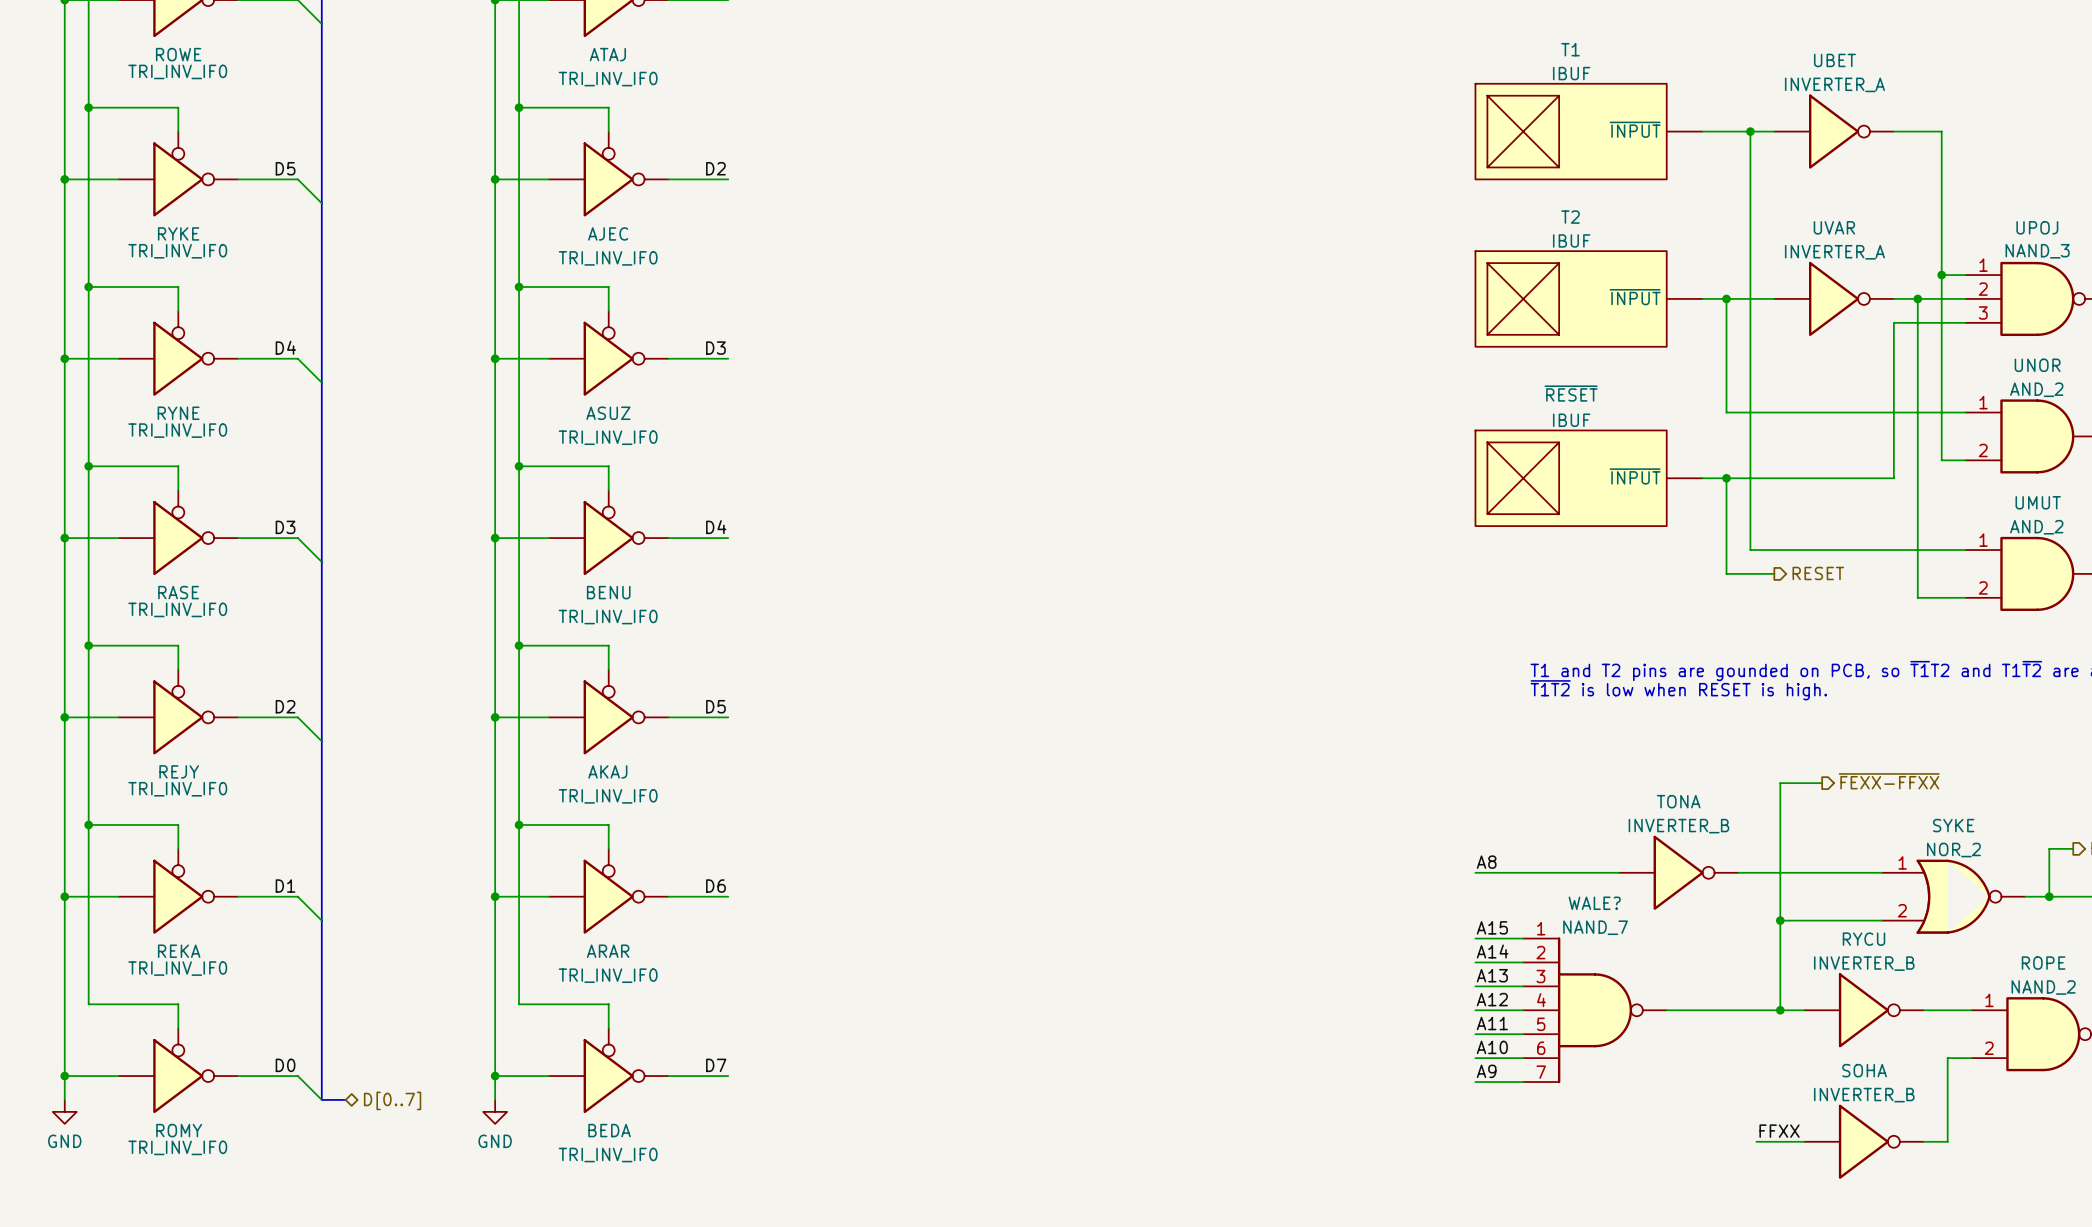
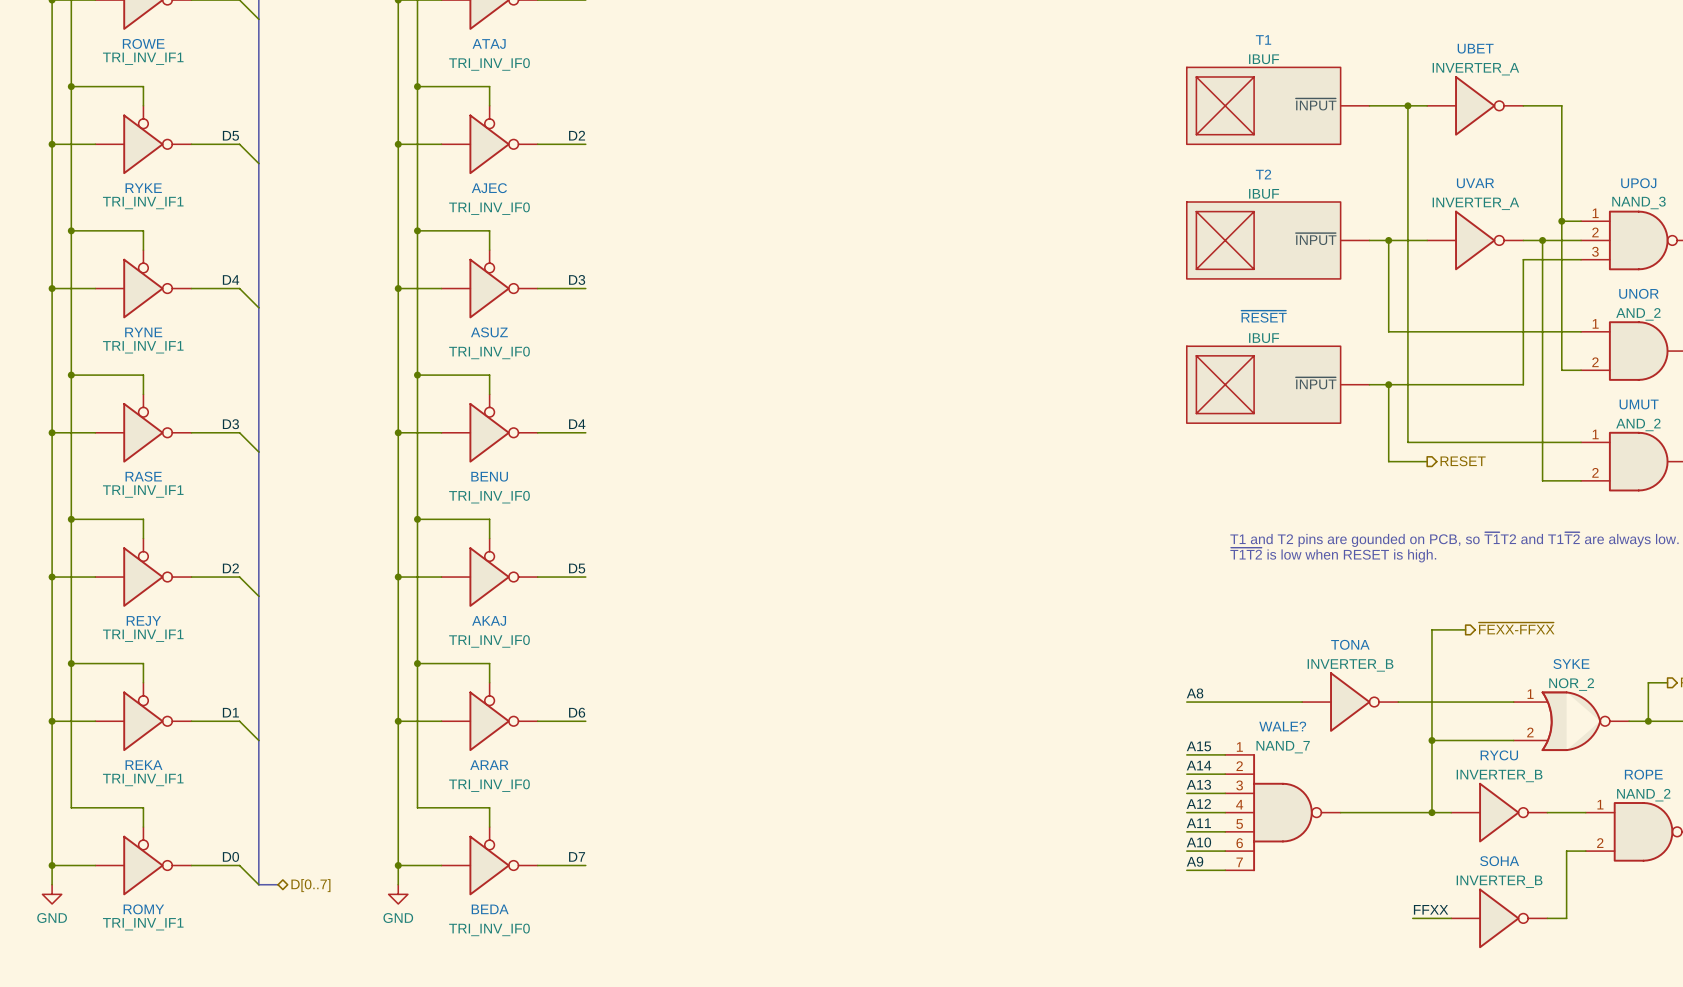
ROWE value: TRI_INV_IF0 (177, 71) -> TRI_INV_IF1 (143, 58)
RYKE value: TRI_INV_IF0 (177, 251) -> TRI_INV_IF1 (143, 203)
RYNE value: TRI_INV_IF0 (177, 430) -> TRI_INV_IF1 (143, 347)
RASE value: TRI_INV_IF0 (177, 609) -> TRI_INV_IF1 (143, 491)
REJY value: TRI_INV_IF0 (177, 789) -> TRI_INV_IF1 (143, 635)
REKA value: TRI_INV_IF0 (177, 968) -> TRI_INV_IF1 (143, 779)
ROMY value: TRI_INV_IF0 (177, 1147) -> TRI_INV_IF1 (143, 924)

